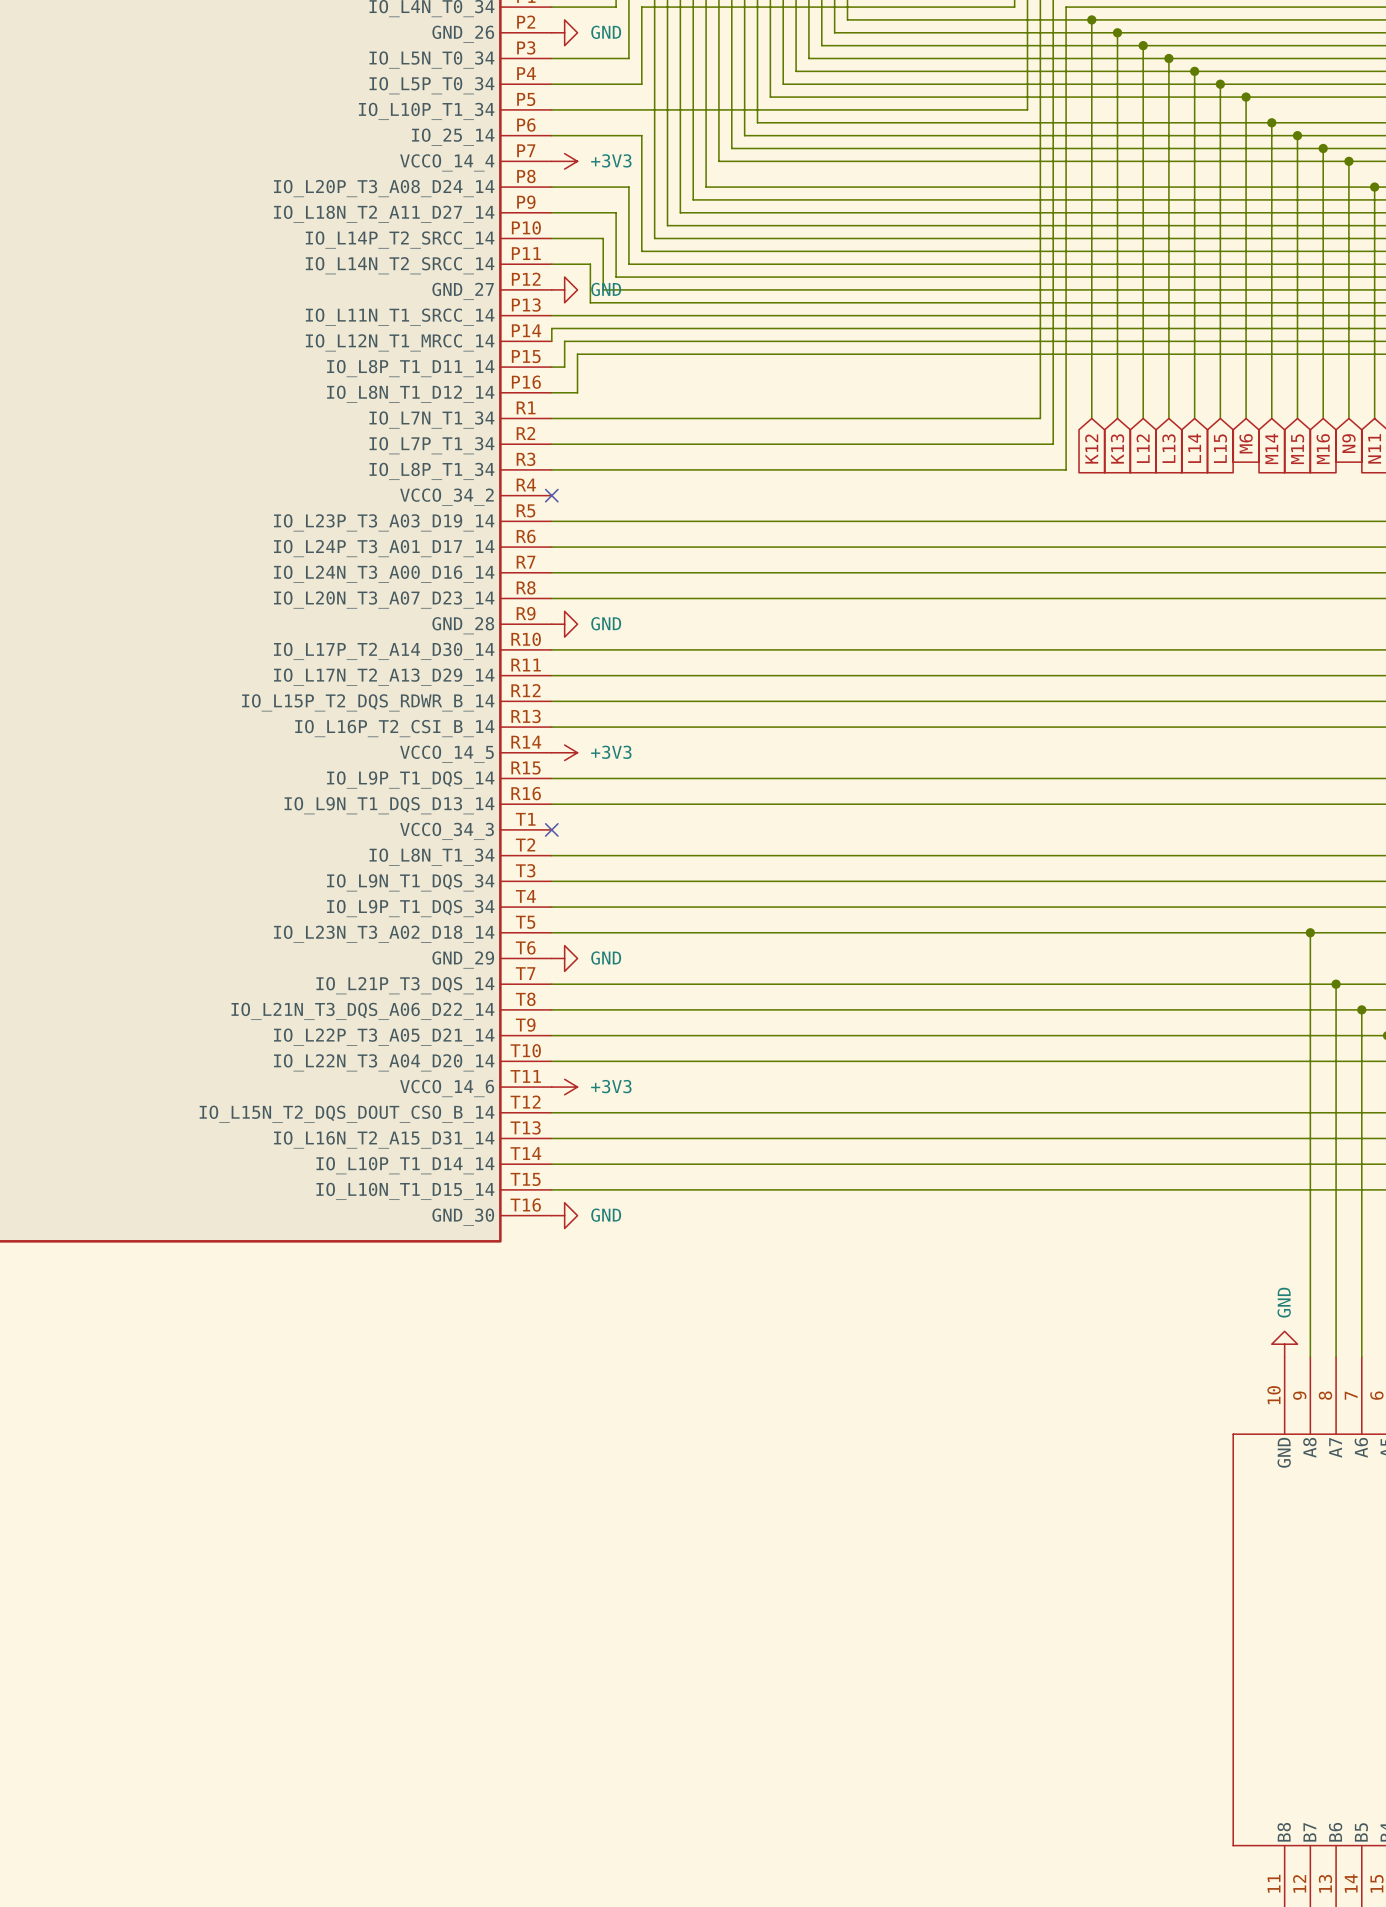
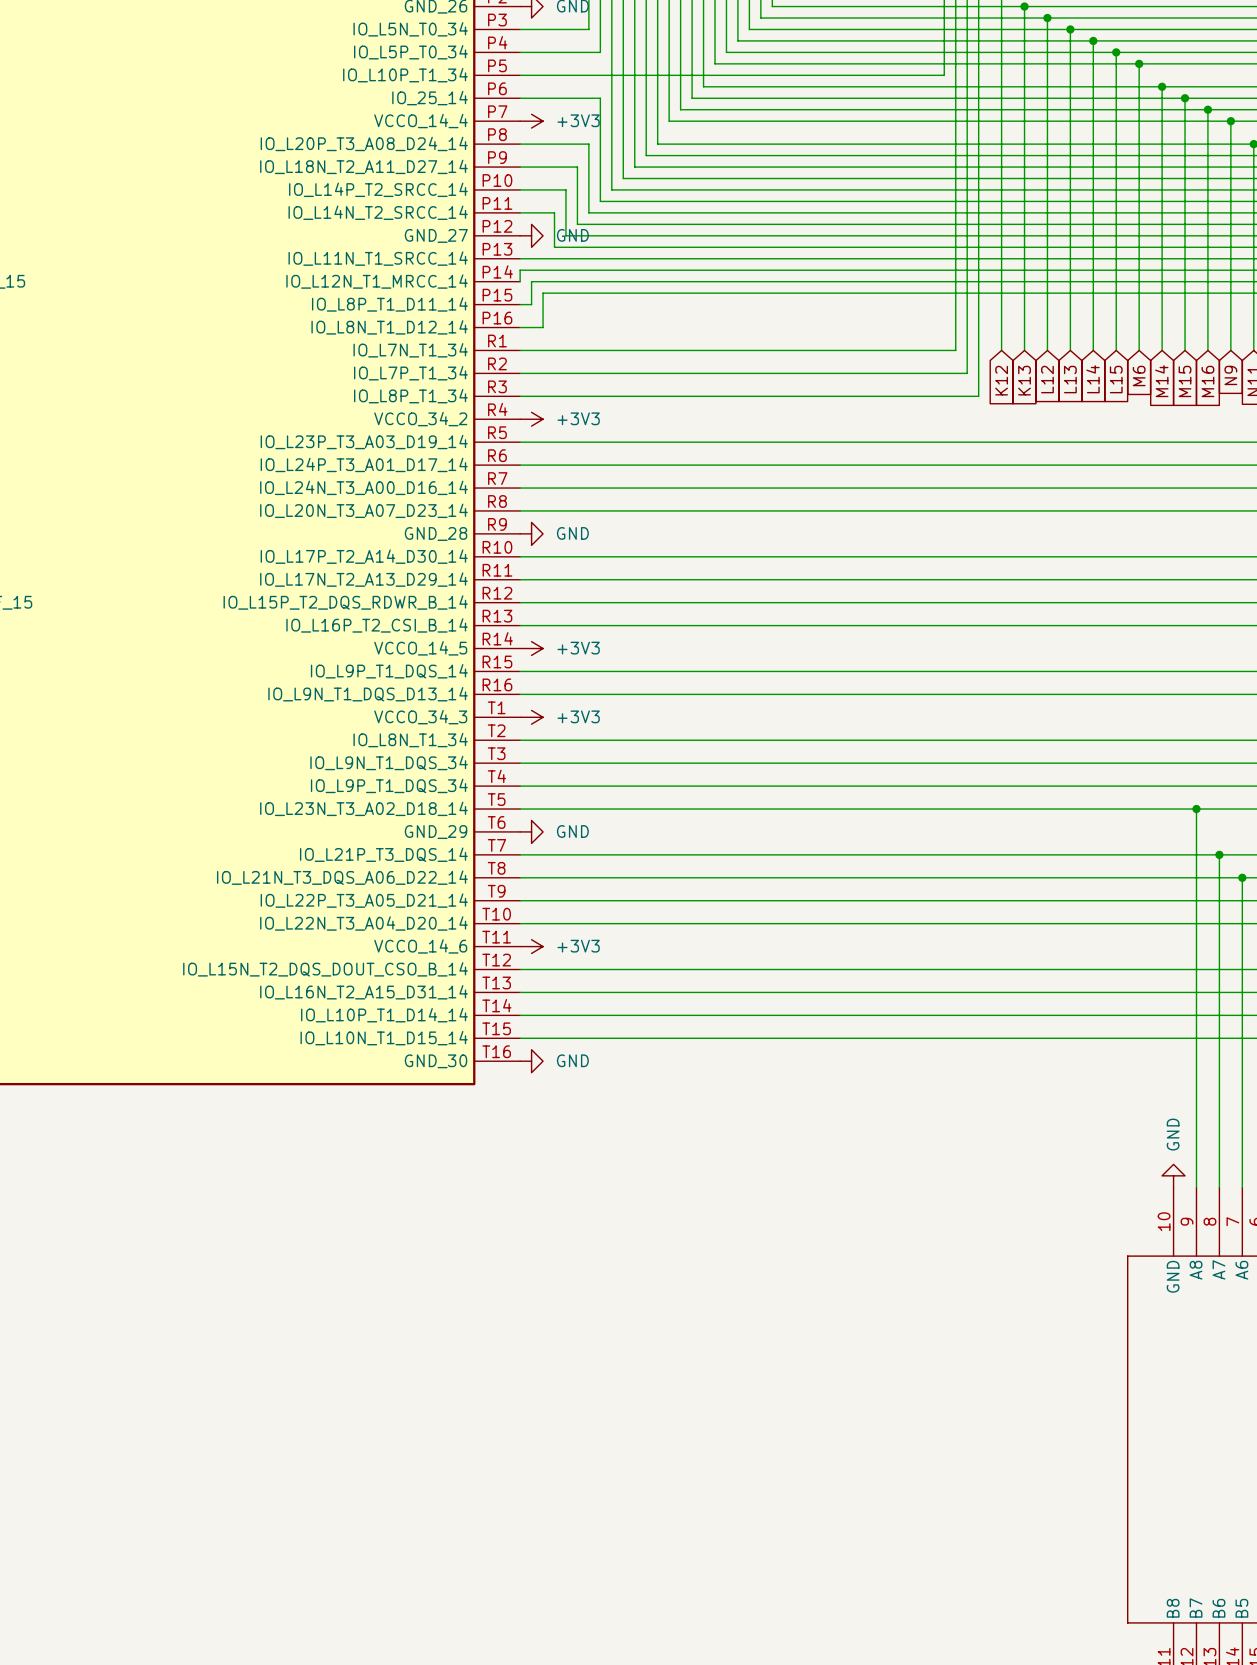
no-connect mark: (551, 495) -> none
power symbol: none -> +3V3 (531, 419)
no-connect mark: (551, 829) -> none
power symbol: none -> +3V3 (531, 717)

